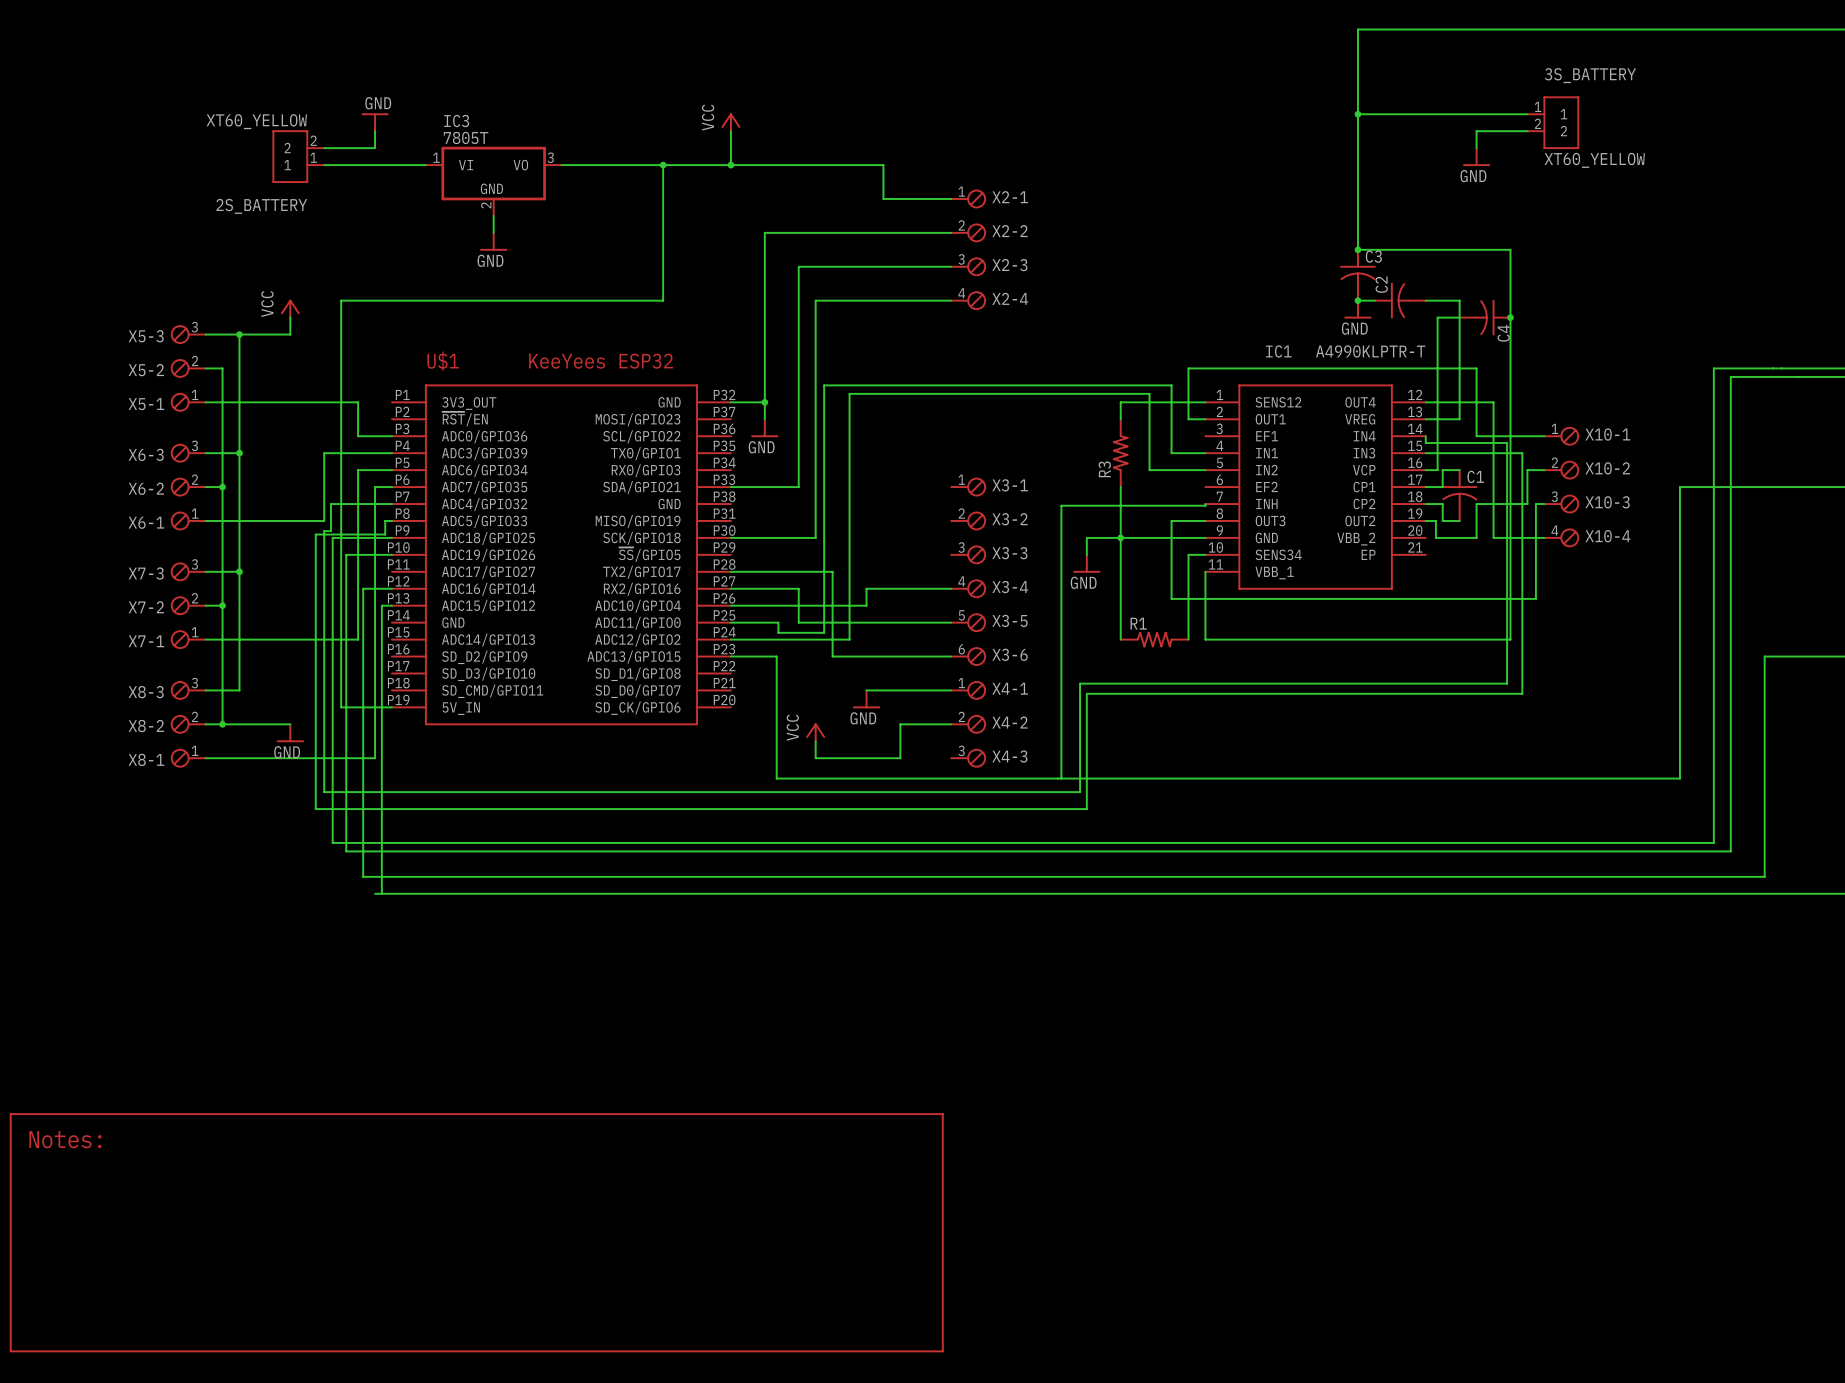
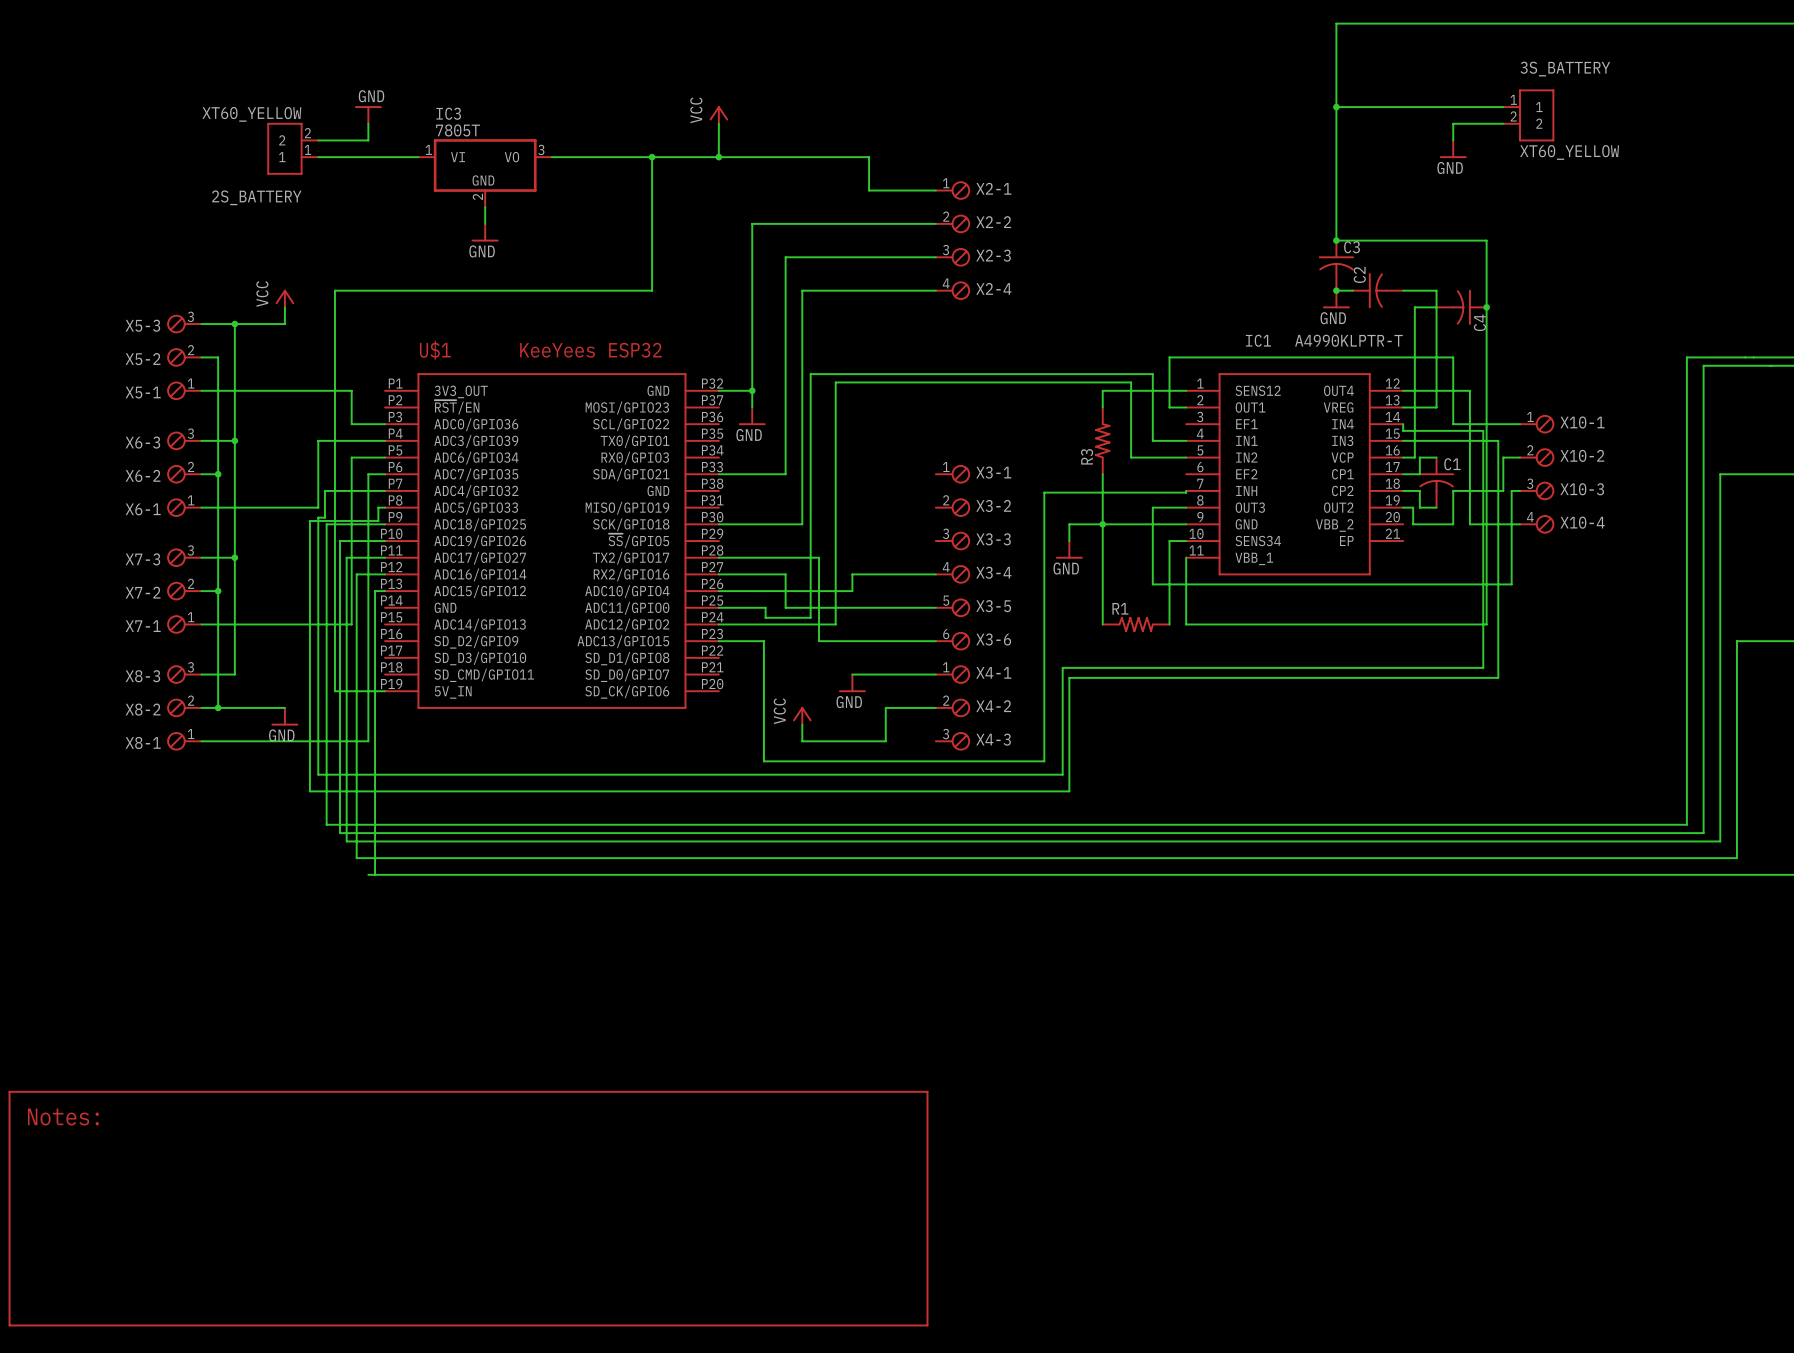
wire: (1747, 487) (1679, 487) (1679, 778) (1061, 778) -> (1720, 474) (1720, 841) (346, 841) (346, 557) (385, 557)

